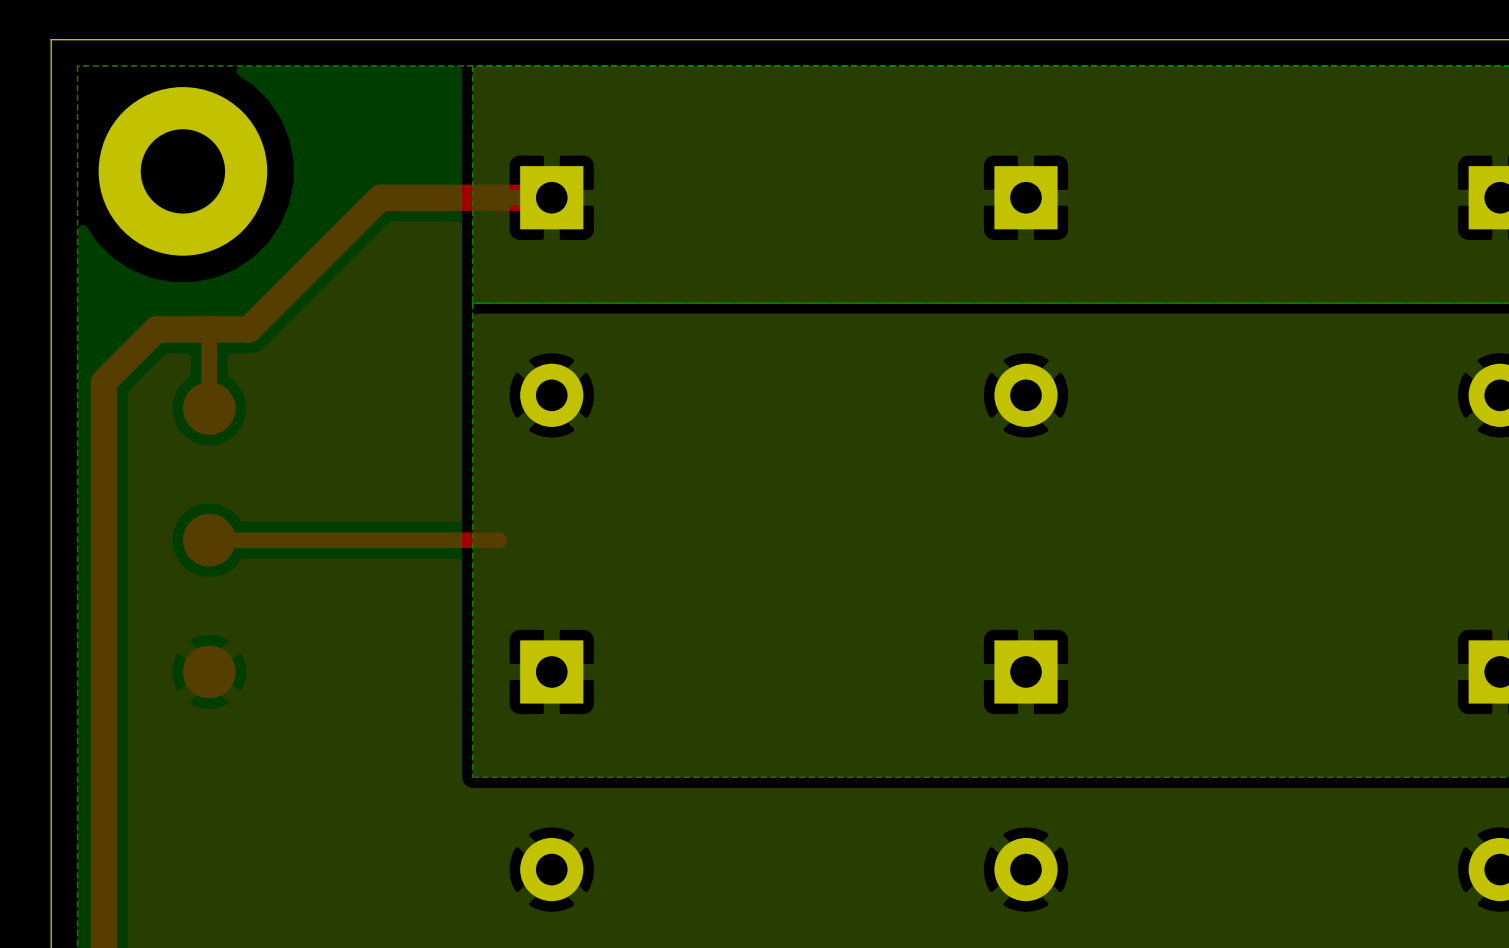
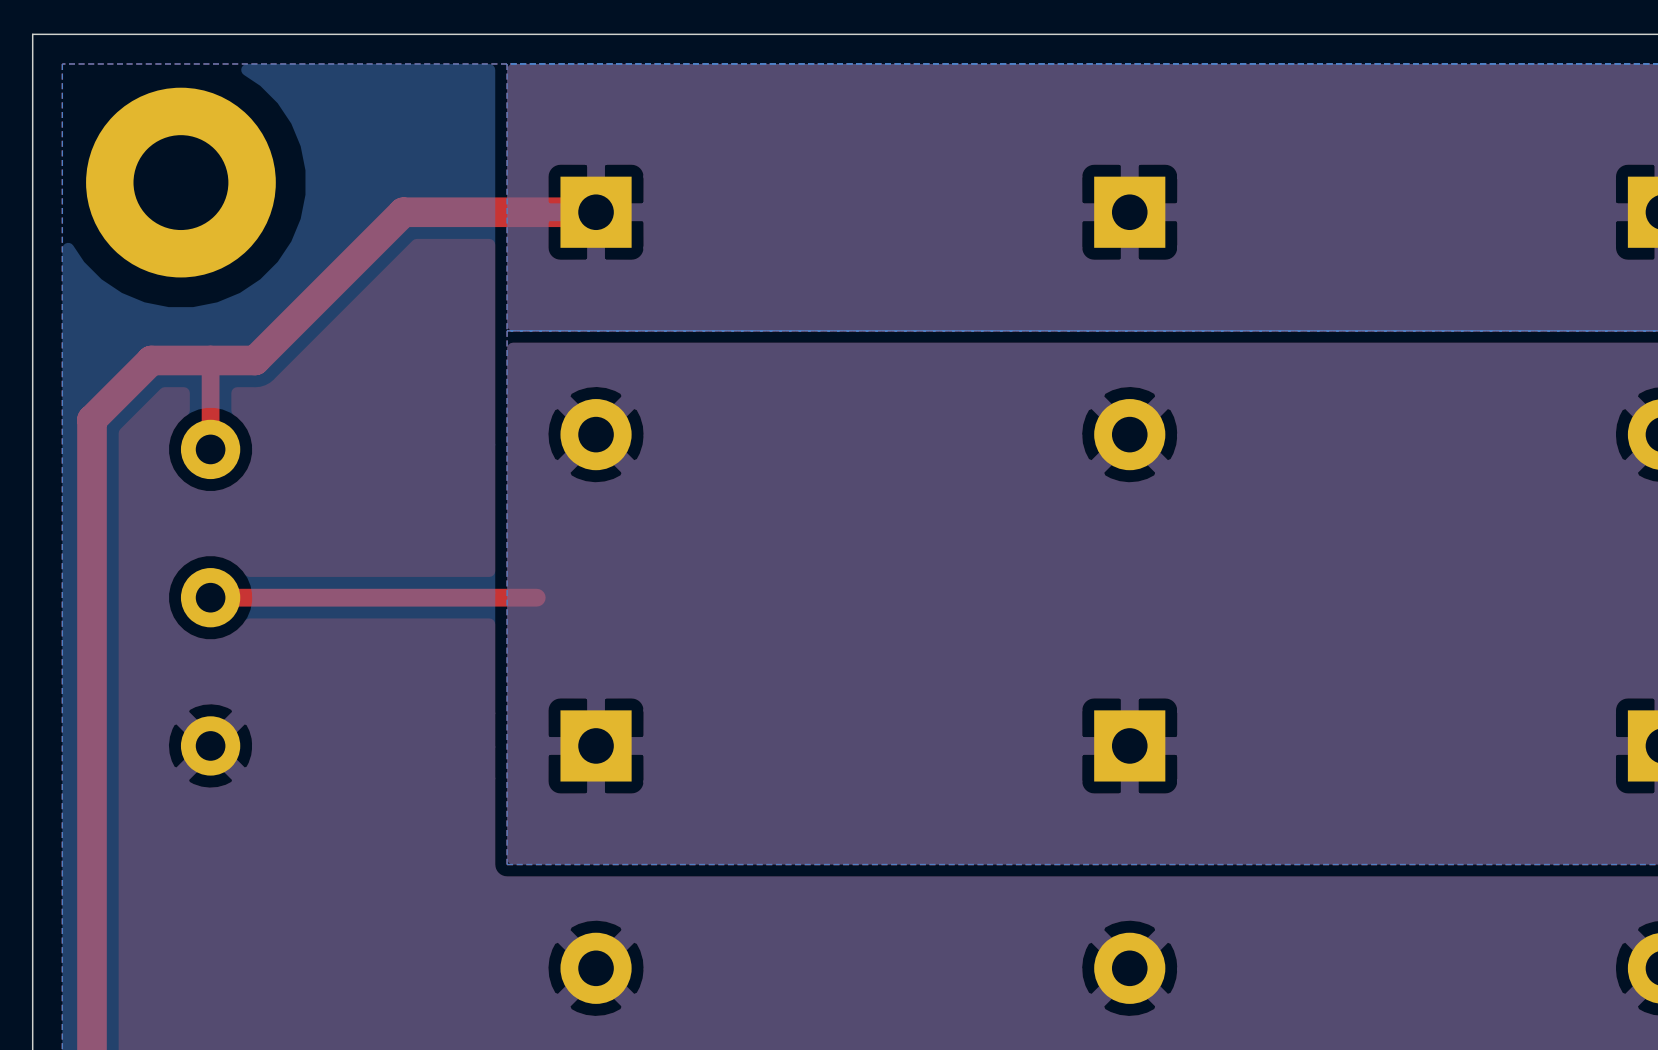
part footprint: [182, 382, 236, 435] -> [180, 419, 241, 480]
part footprint: [182, 513, 236, 567] -> [180, 568, 241, 628]
part footprint: [182, 645, 236, 699] -> [180, 716, 241, 776]

